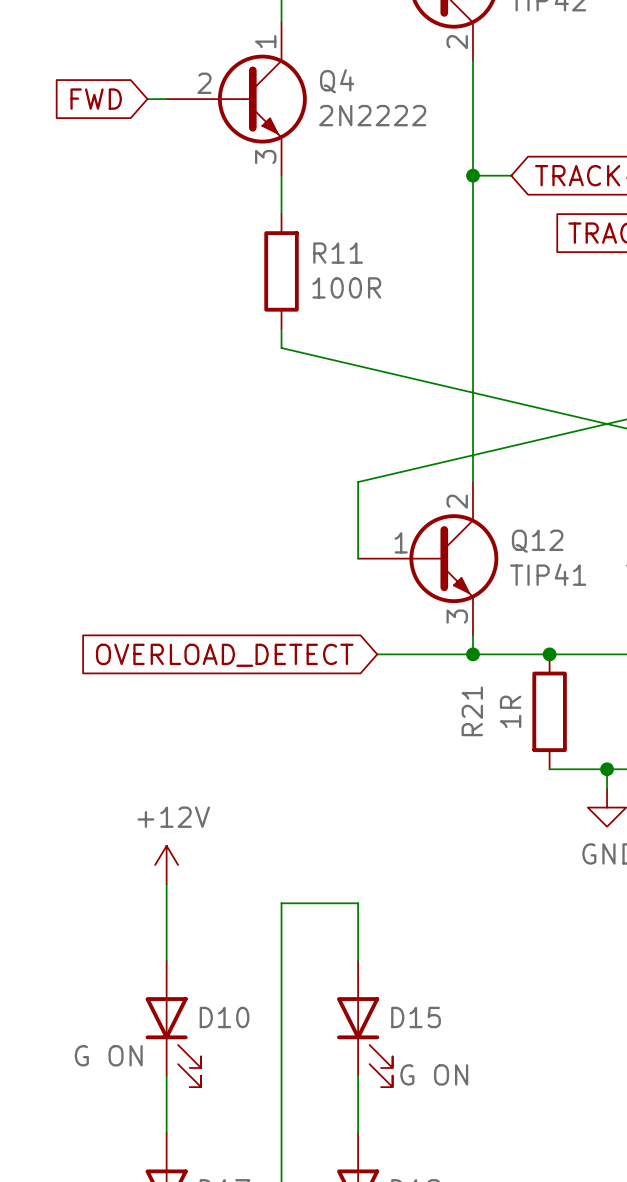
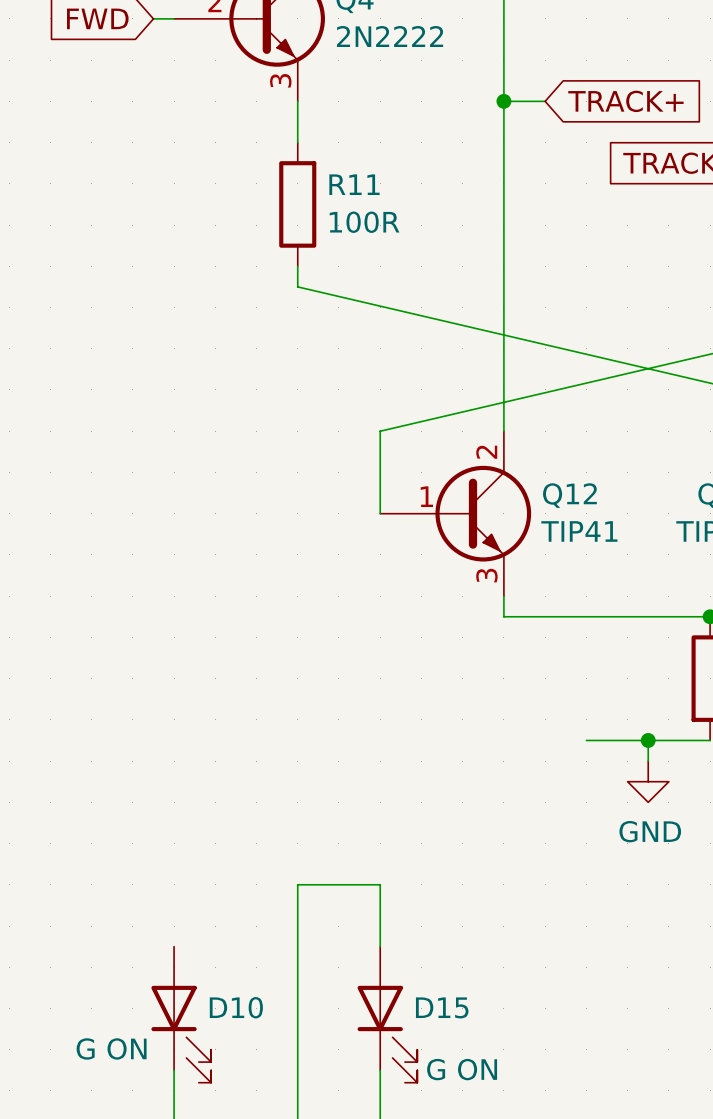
wire: (377, 654) (473, 654) -> none
junction: (473, 654) -> none
junction: (549, 654) -> none
global label: OVERLOAD_DETECT (224, 655) -> none
R21: 1R (549, 711) -> none
power symbol: +12V (166, 865) -> none
wire: (166, 884) (166, 960) -> none

